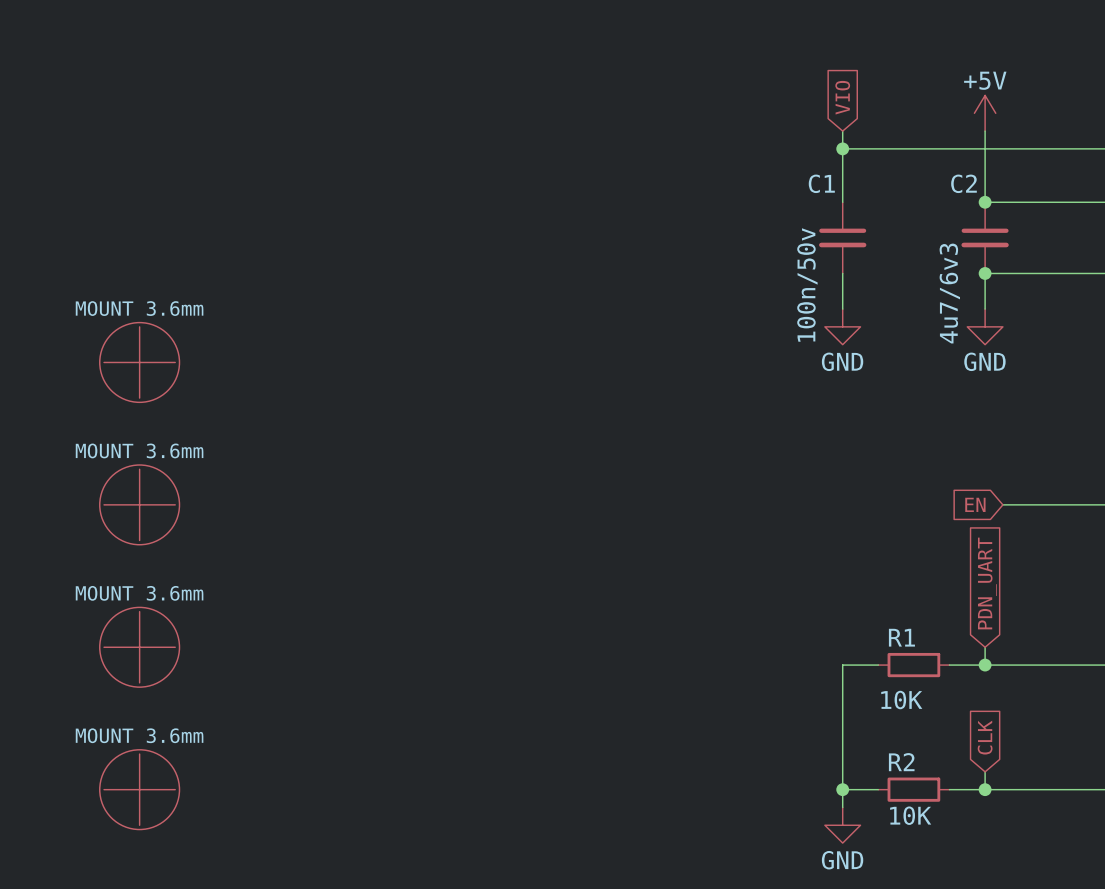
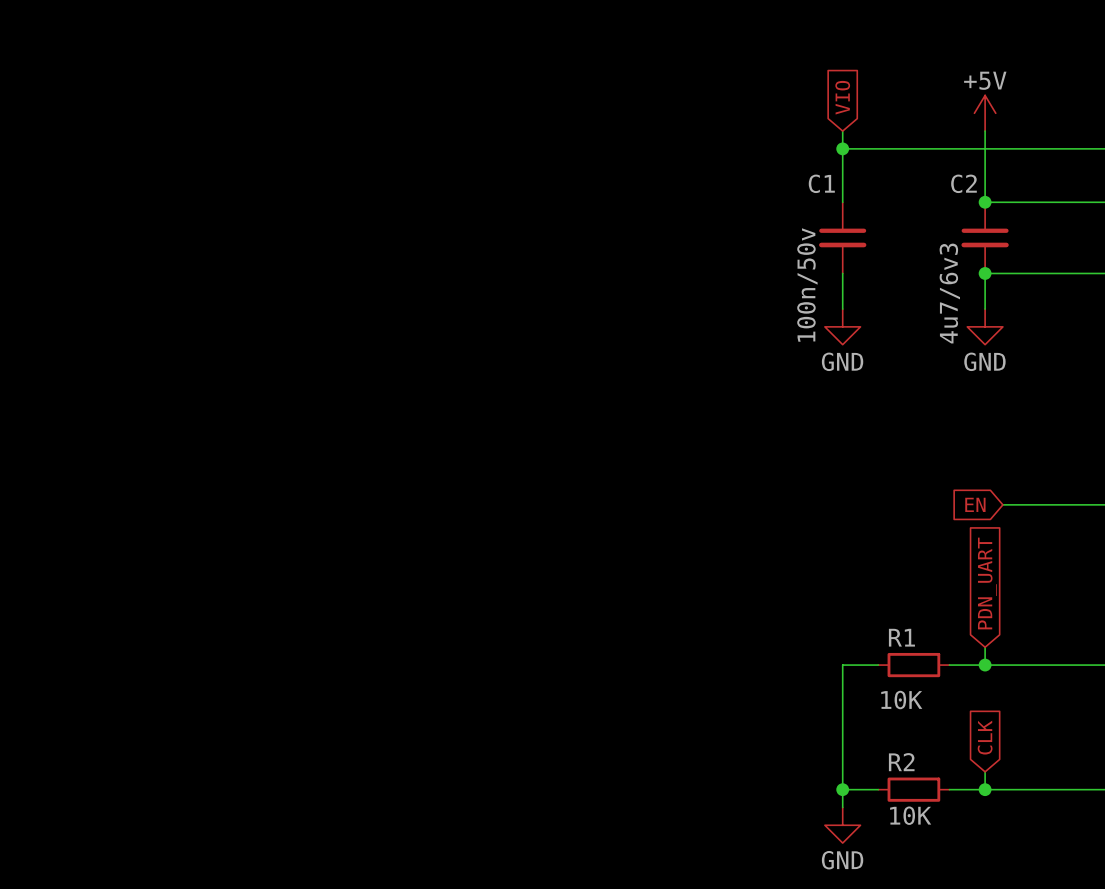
part: MOUNT 3.6mm (139, 362) -> none
part: MOUNT 3.6mm (139, 504) -> none
part: MOUNT 3.6mm (139, 647) -> none
part: MOUNT 3.6mm (139, 789) -> none

